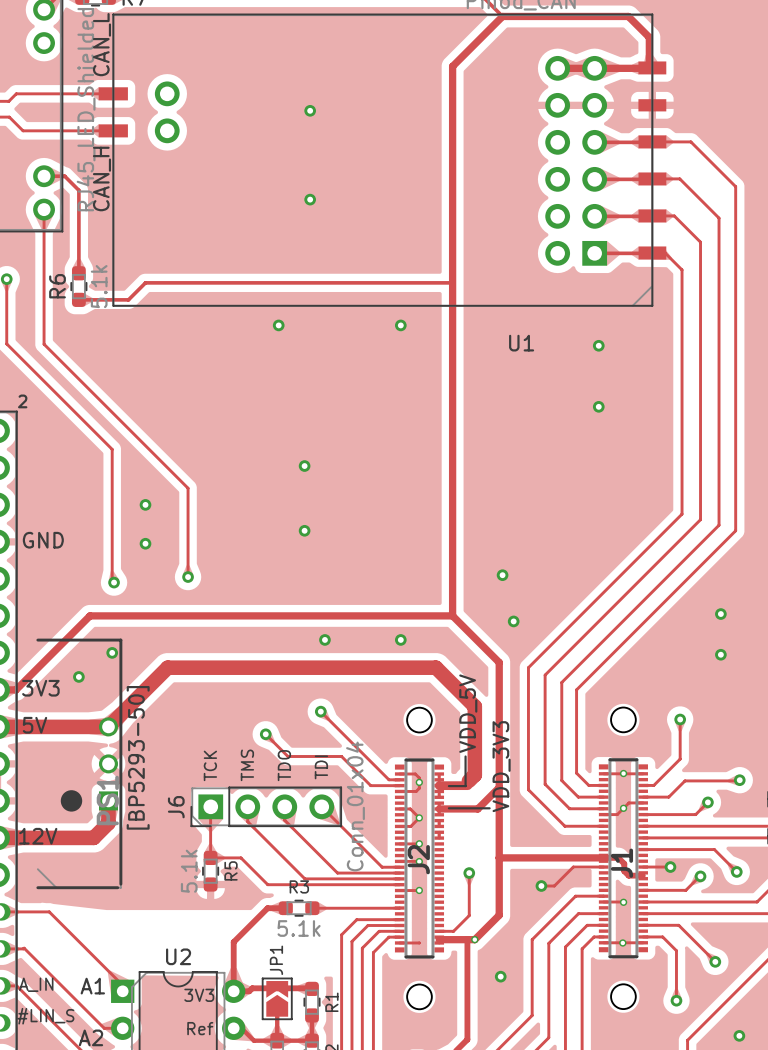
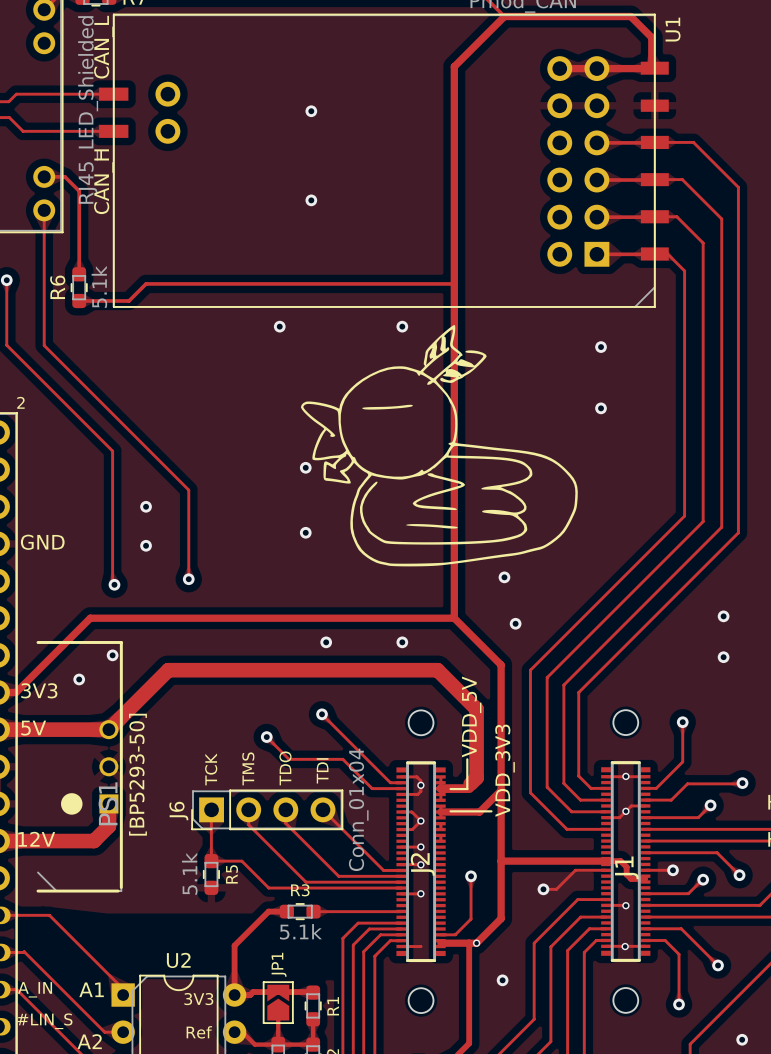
drawing: none -> [300, 324, 578, 567]
U1 name rotation: 0° (521, 343) -> 90° counterclockwise (673, 29)
U1 name position: U1 (521, 343) -> U1 (673, 29)

